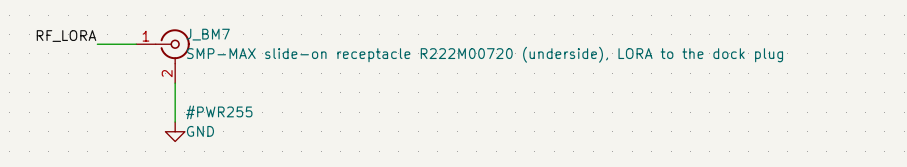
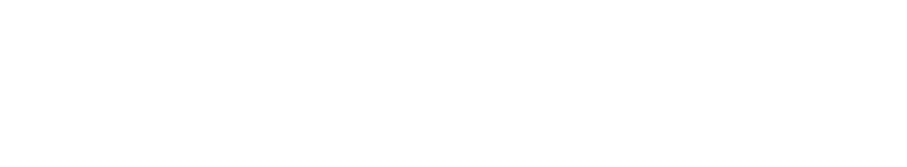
label: RF_LORA (66, 36) -> none
wire: (97, 44) (136, 44) -> none
J_BM7: SMP-MAX slide-on receptacle R222M00720 (underside), LORA to the dock plug (163, 56) -> none
wire: (175, 83) (175, 122) -> none
#PWR255: GND (175, 131) -> none

